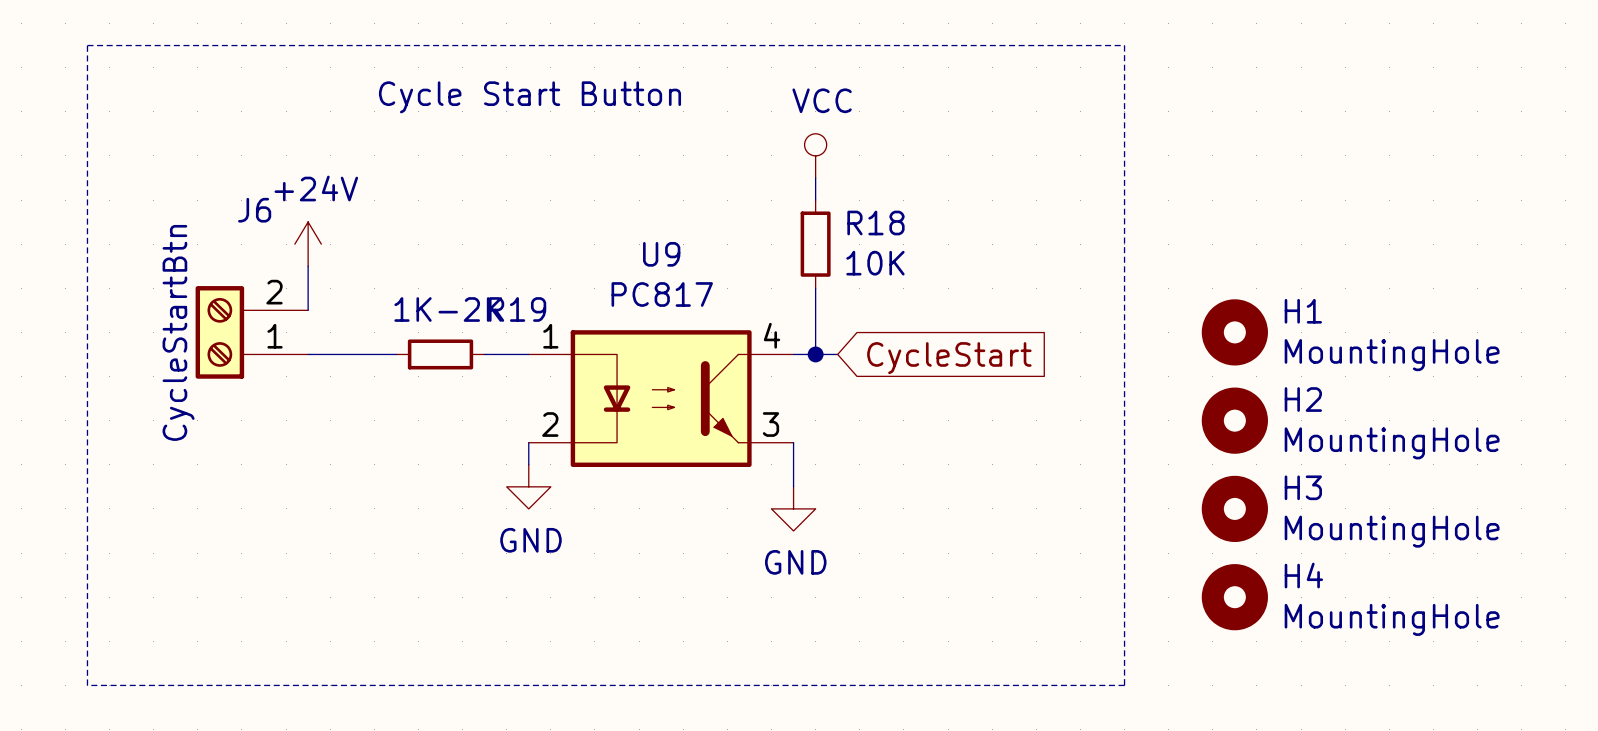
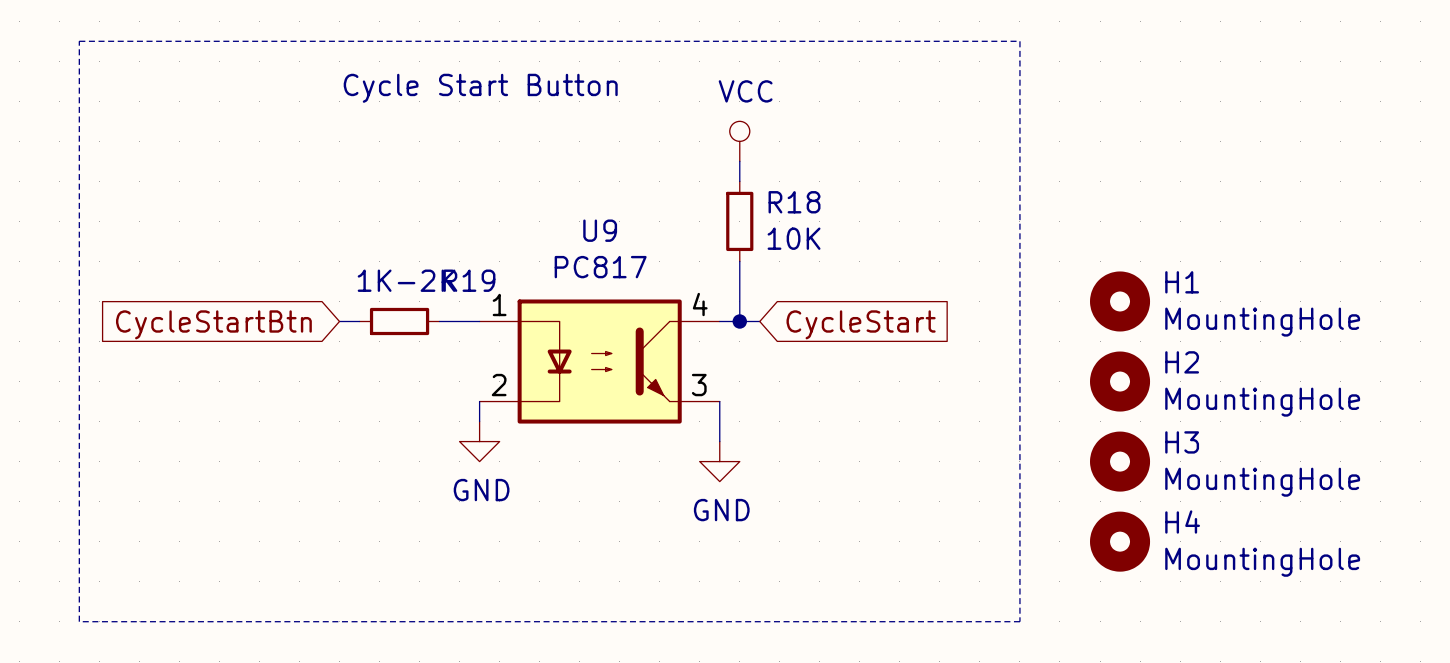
power symbol: +24V (308, 244) -> none
wire: (308, 266) (308, 310) -> none
J6: CycleStartBtn (251, 332) -> none
wire: (308, 354) (374, 354) -> none
global label: none -> CycleStartBtn (213, 324)

